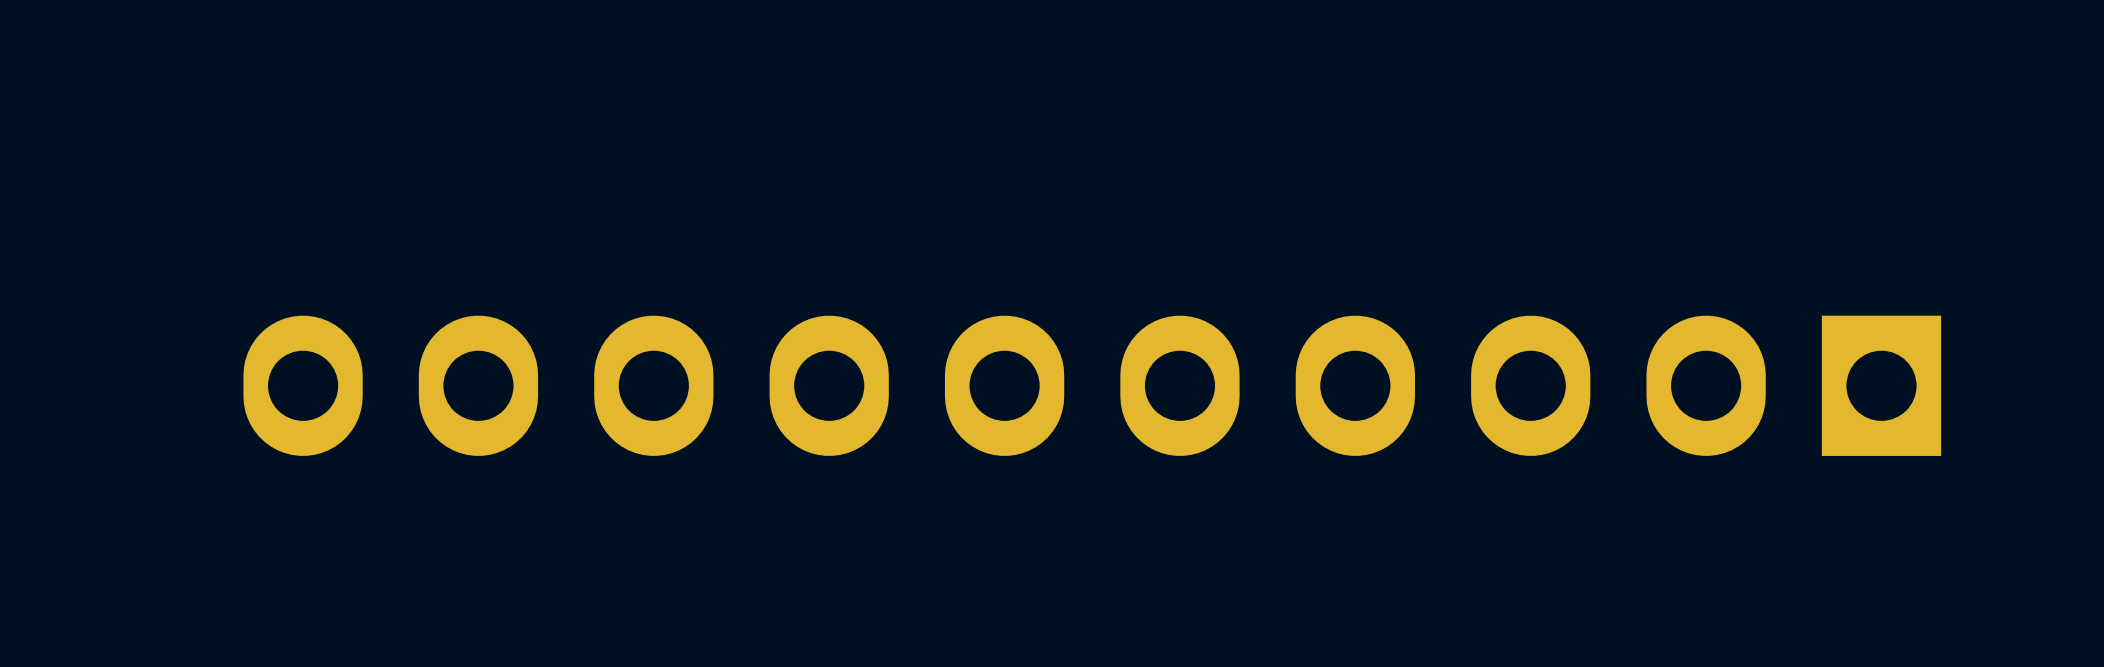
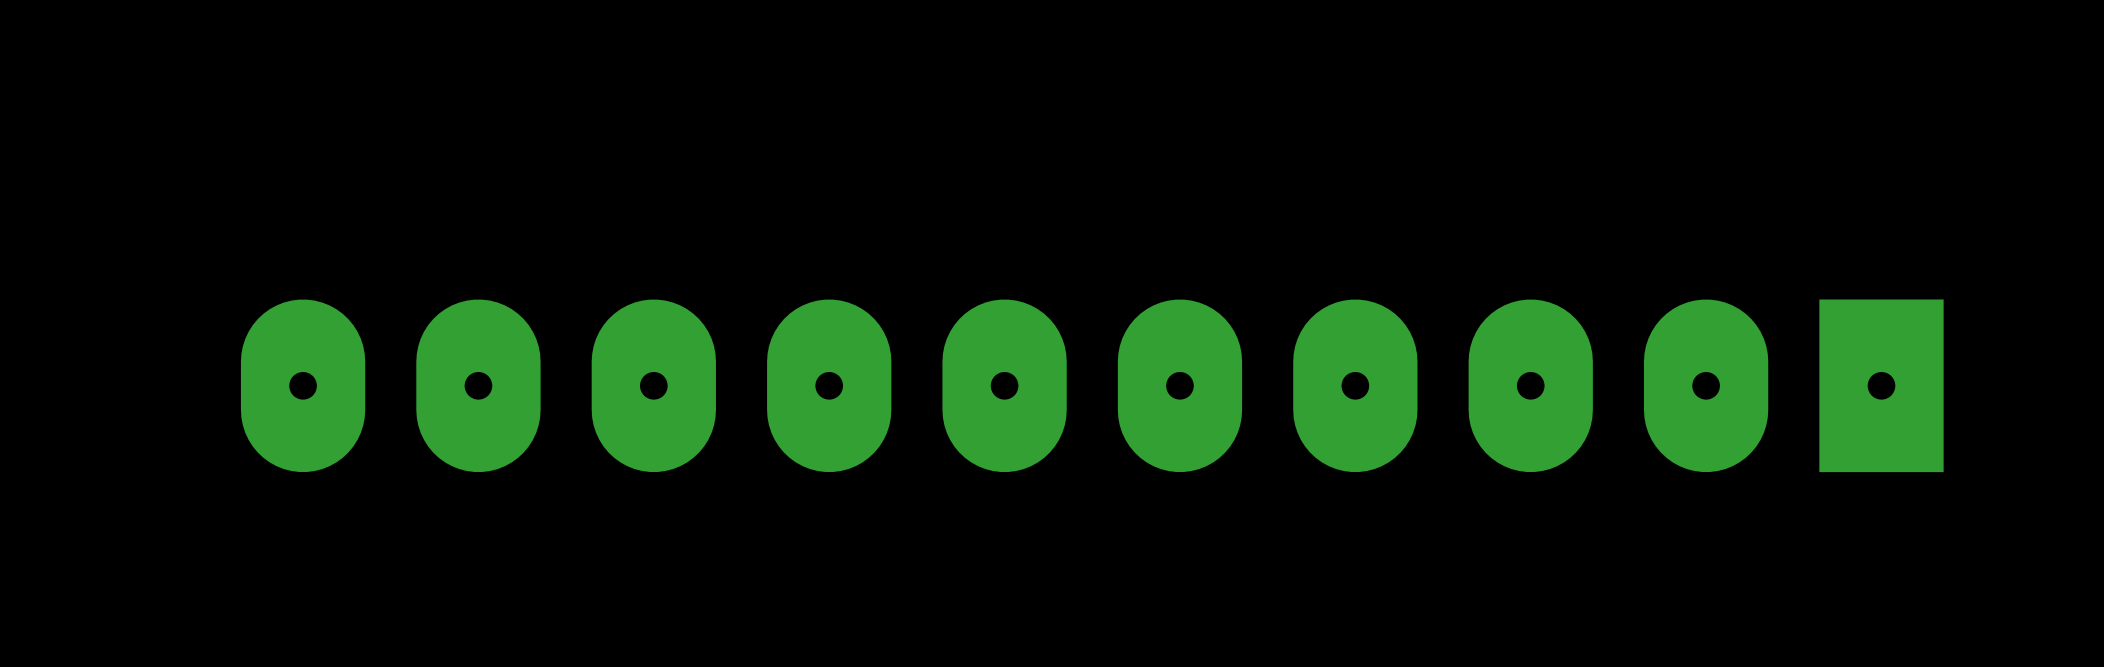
part footprint: [243, 315, 1942, 456] -> [240, 299, 1944, 473]

